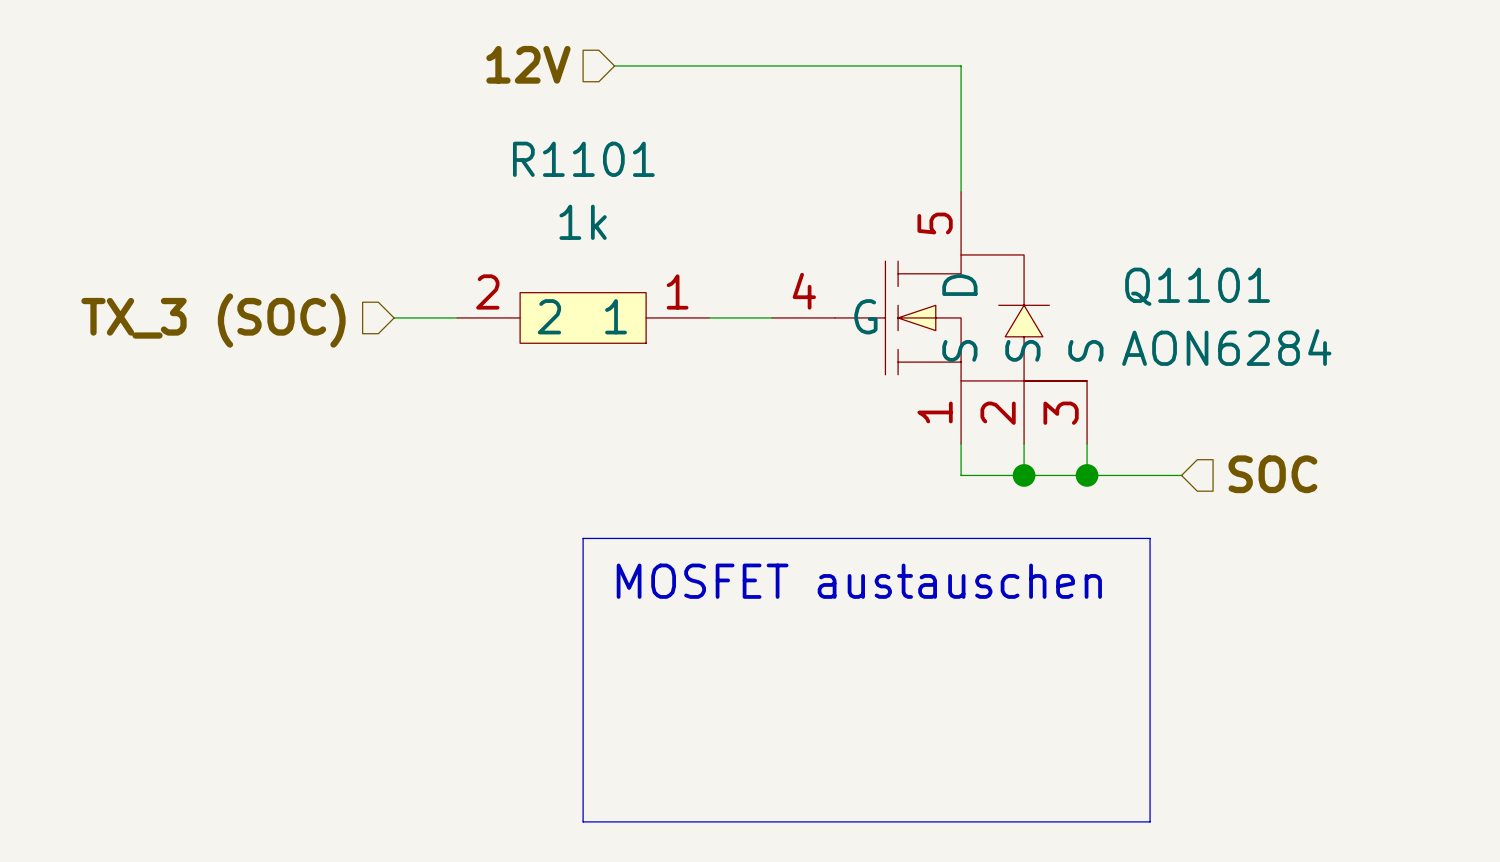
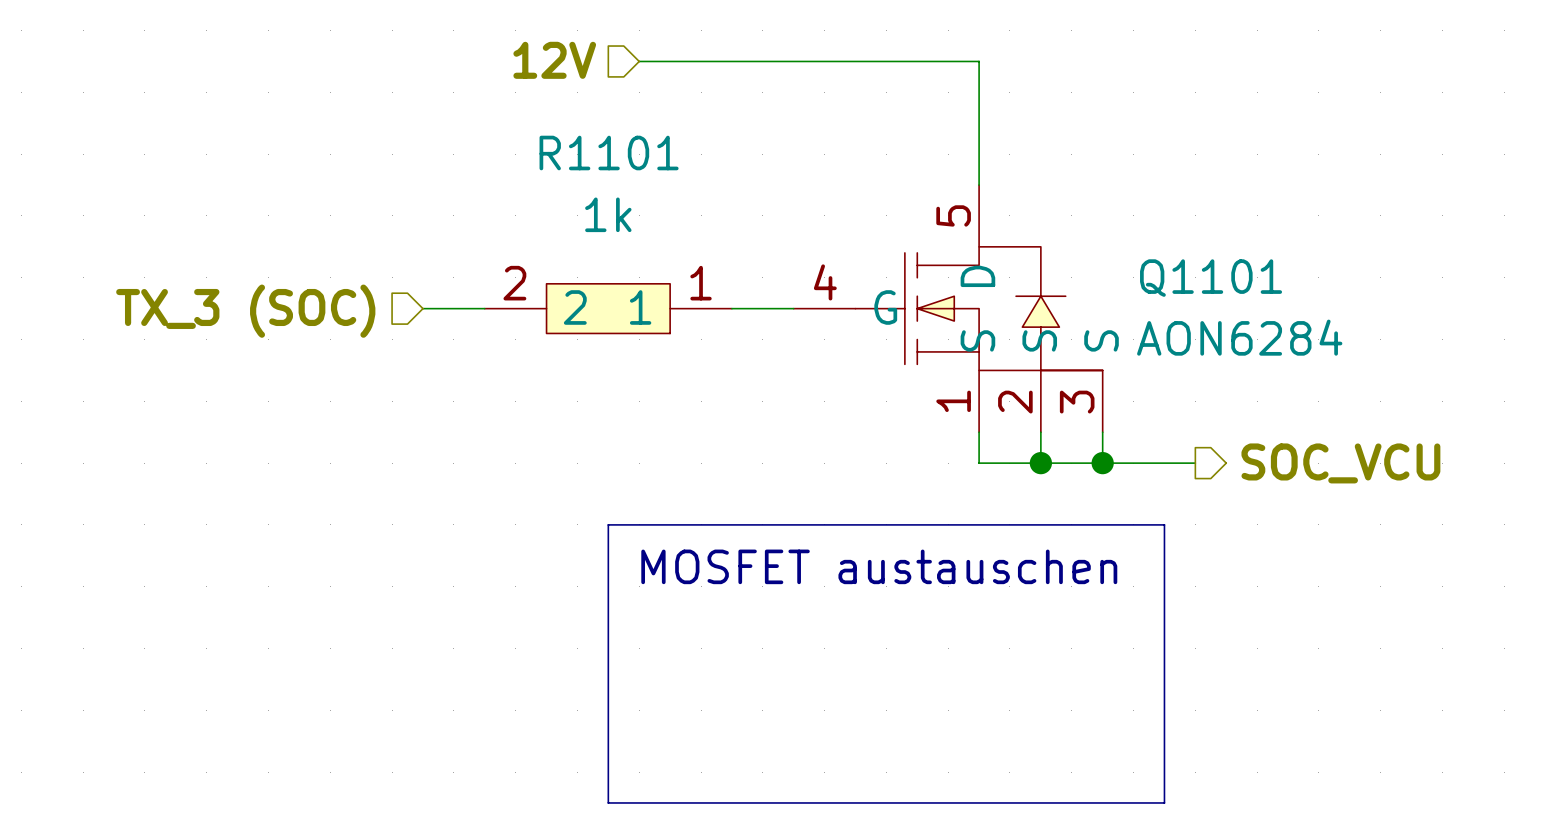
hierarchical label shape: input (1272, 474) -> output (1340, 463)
hierarchical label: SOC (1272, 474) -> SOC_VCU (1340, 463)

